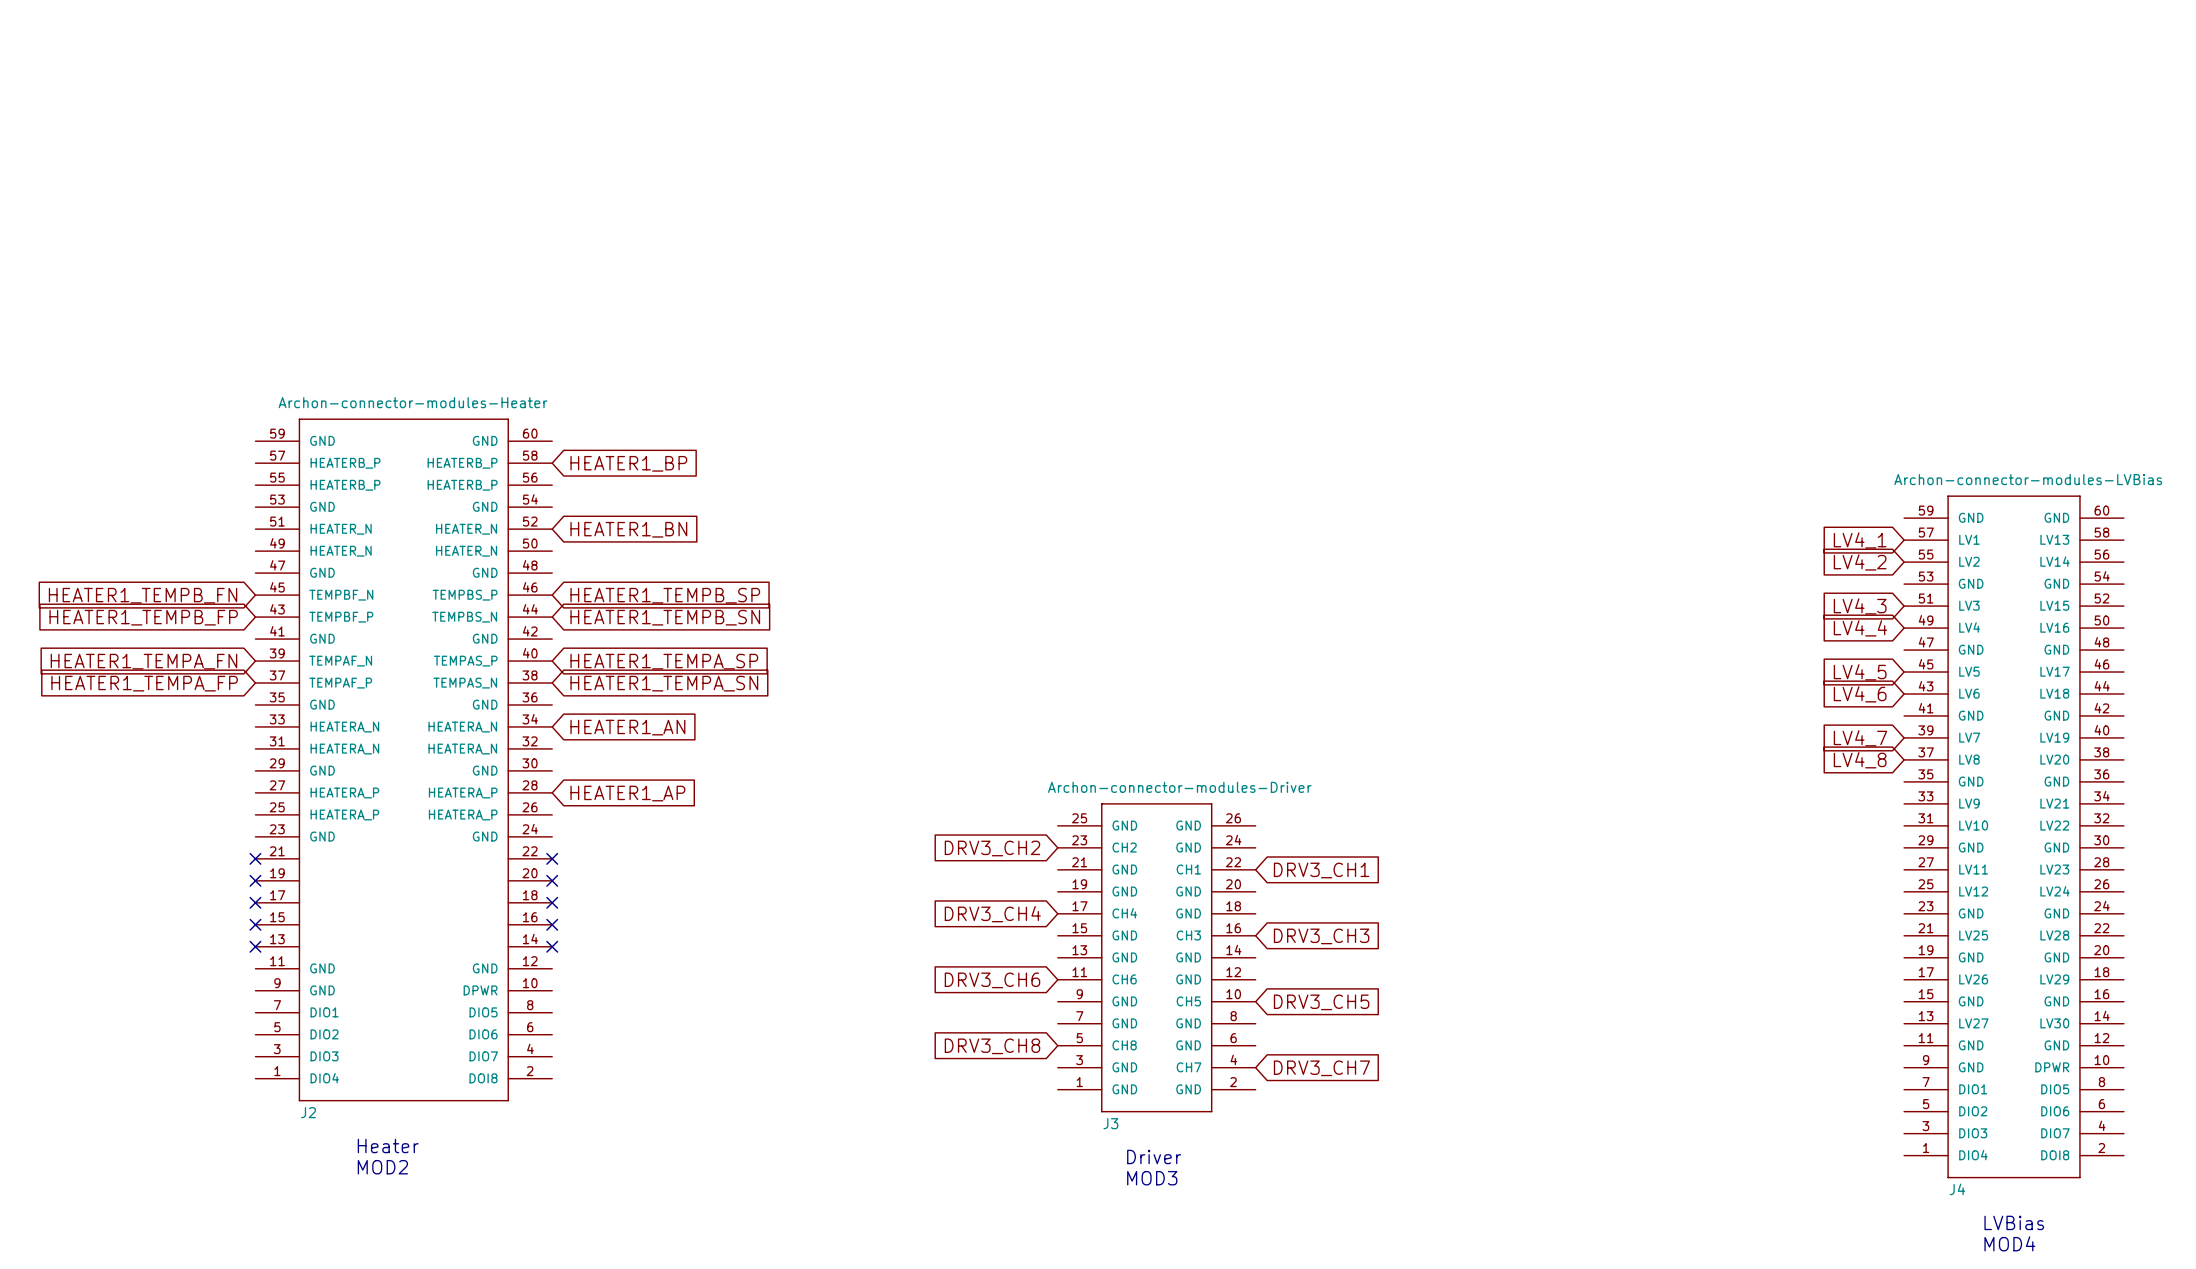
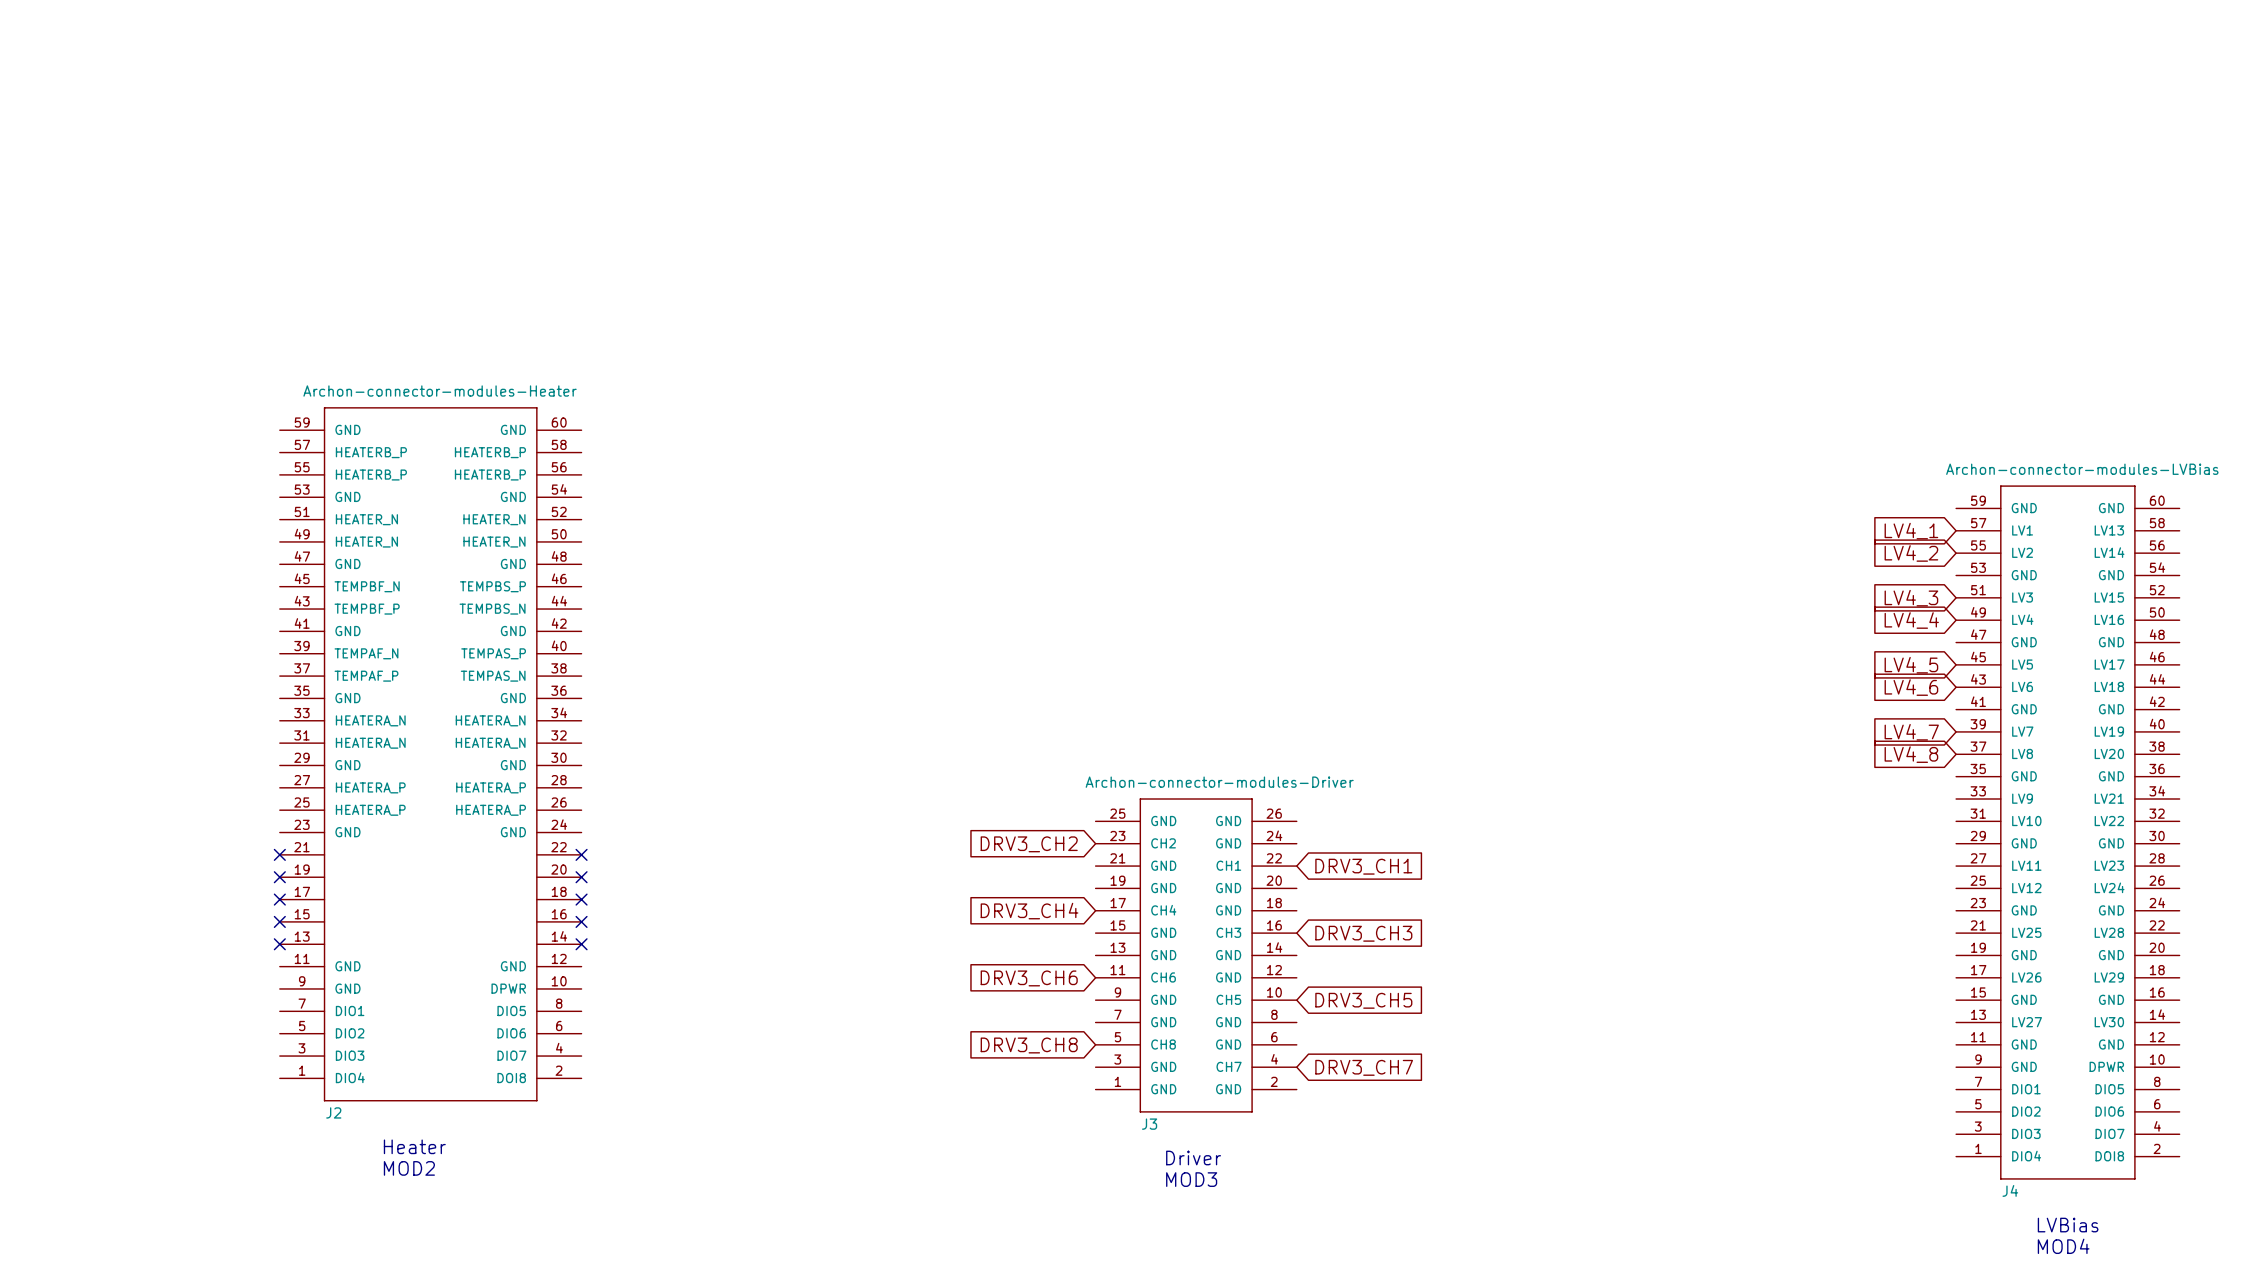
global label: HEATER1_BP (628, 463) -> none
global label: HEATER1_BN (628, 529) -> none
global label: HEATER1_TEMPB_FN (143, 595) -> none
global label: HEATER1_TEMPB_SP (665, 595) -> none
global label: HEATER1_TEMPB_FP (143, 617) -> none
global label: HEATER1_TEMPB_SN (665, 617) -> none
global label: HEATER1_TEMPA_FN (143, 661) -> none
global label: HEATER1_TEMPA_SP (664, 661) -> none
global label: HEATER1_TEMPA_FP (144, 683) -> none
global label: HEATER1_TEMPA_SN (664, 683) -> none
global label: HEATER1_AN (627, 727) -> none
global label: HEATER1_AP (627, 793) -> none

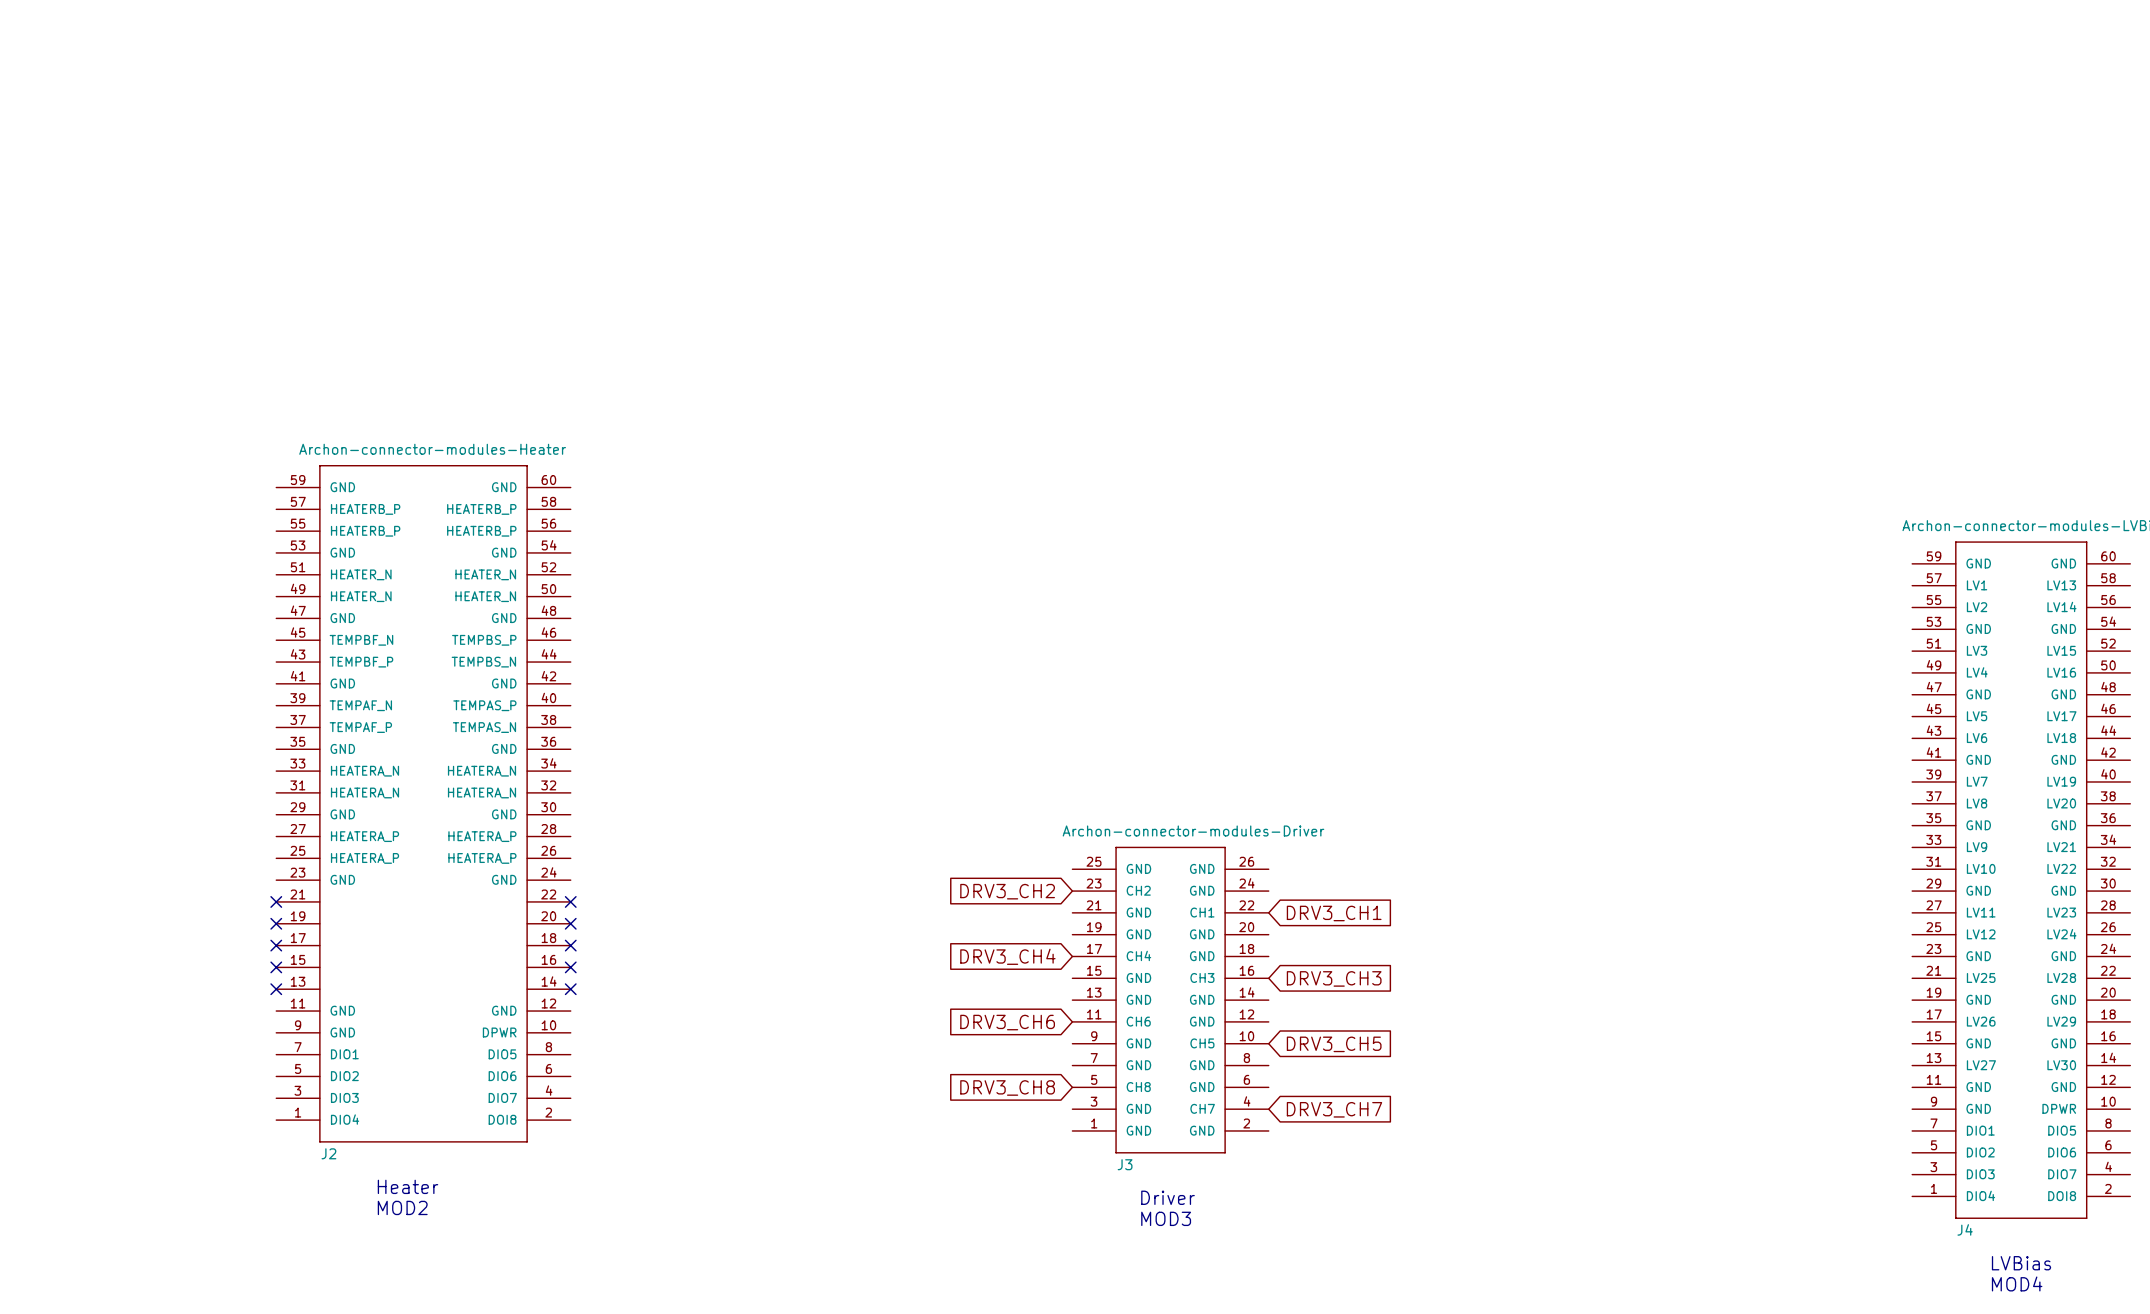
global label: LV4_1 (1911, 531) -> none
global label: LV4_2 (1911, 553) -> none
global label: LV4_3 (1911, 598) -> none
global label: LV4_4 (1911, 620) -> none
global label: LV4_5 (1911, 665) -> none
global label: LV4_6 (1911, 687) -> none
global label: LV4_7 (1911, 732) -> none
global label: LV4_8 (1911, 754) -> none

